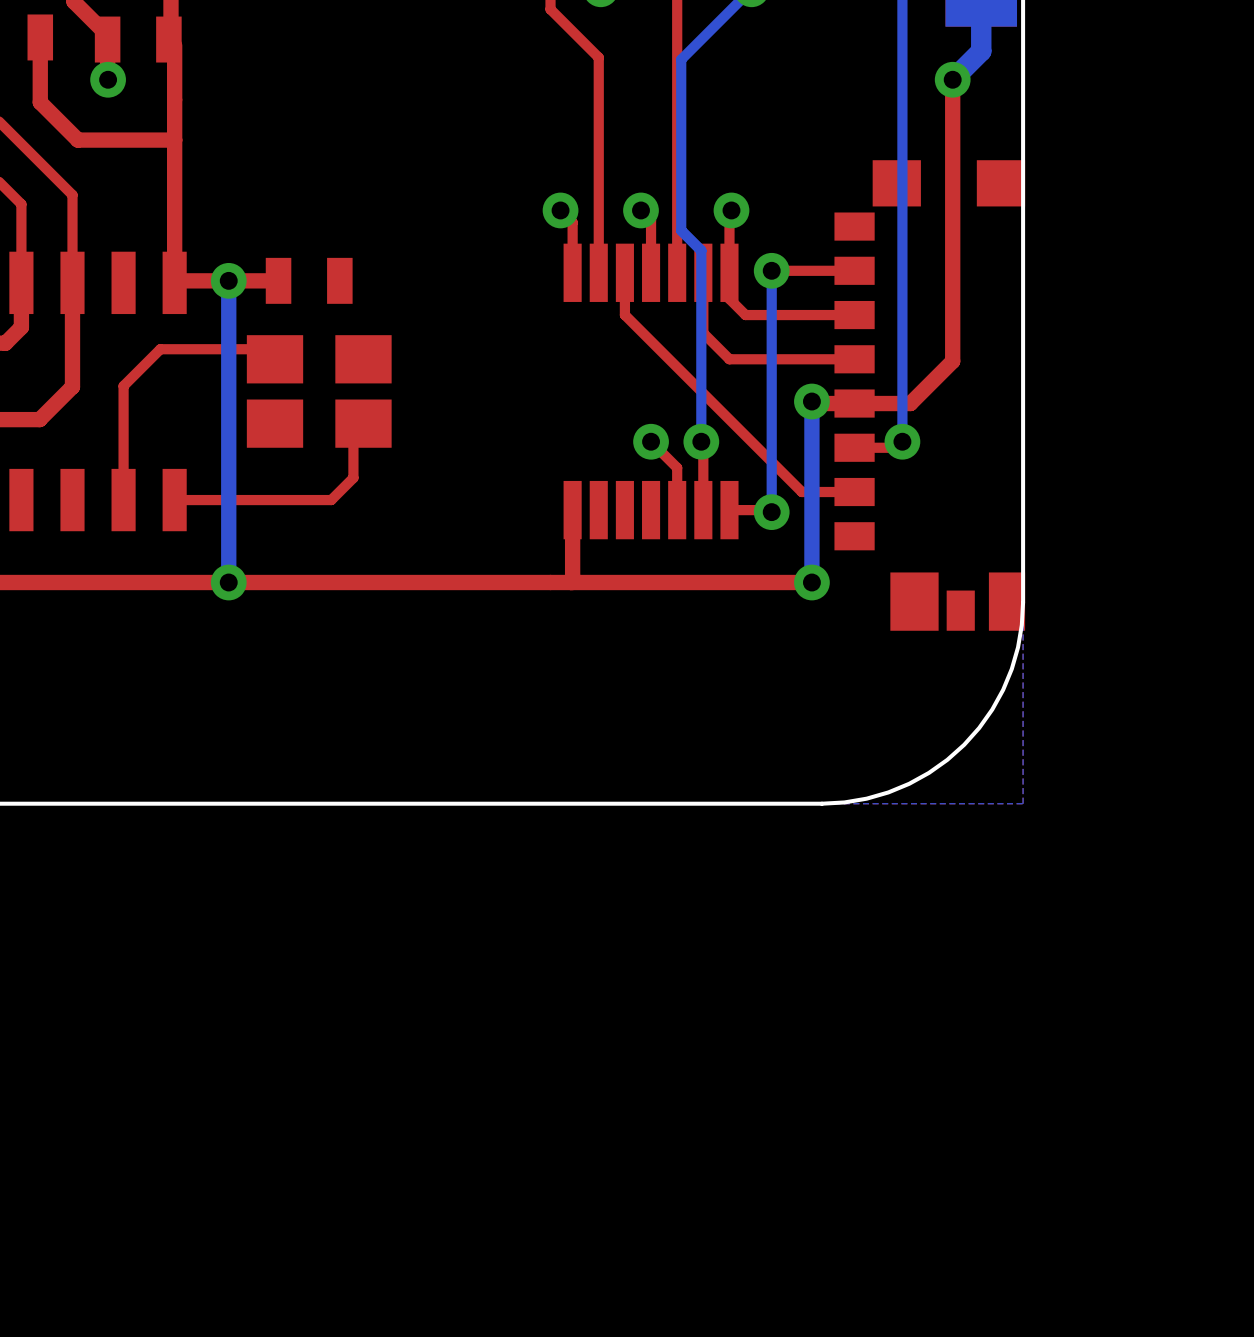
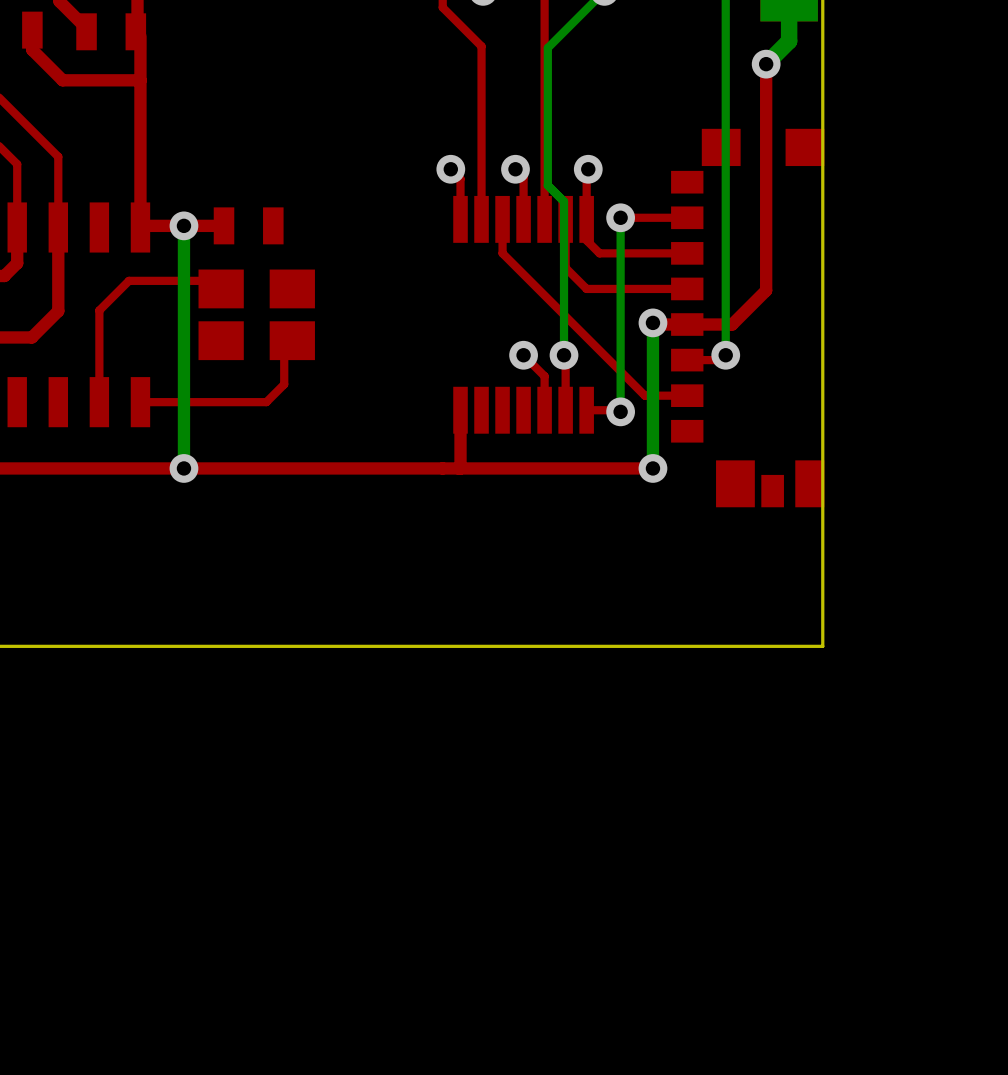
top track: (40, 62) (40, 102) (77, 140) (174, 140) -> (32, 50) (62, 80) (140, 80)
via: (108, 79) -> none
board edge: (1023, 602) (1021, 625) (1011, 669) (992, 709) (964, 744) (928, 772) (888, 792) (844, 802) (821, 803) -> (822, 484) (822, 646) (661, 646)

